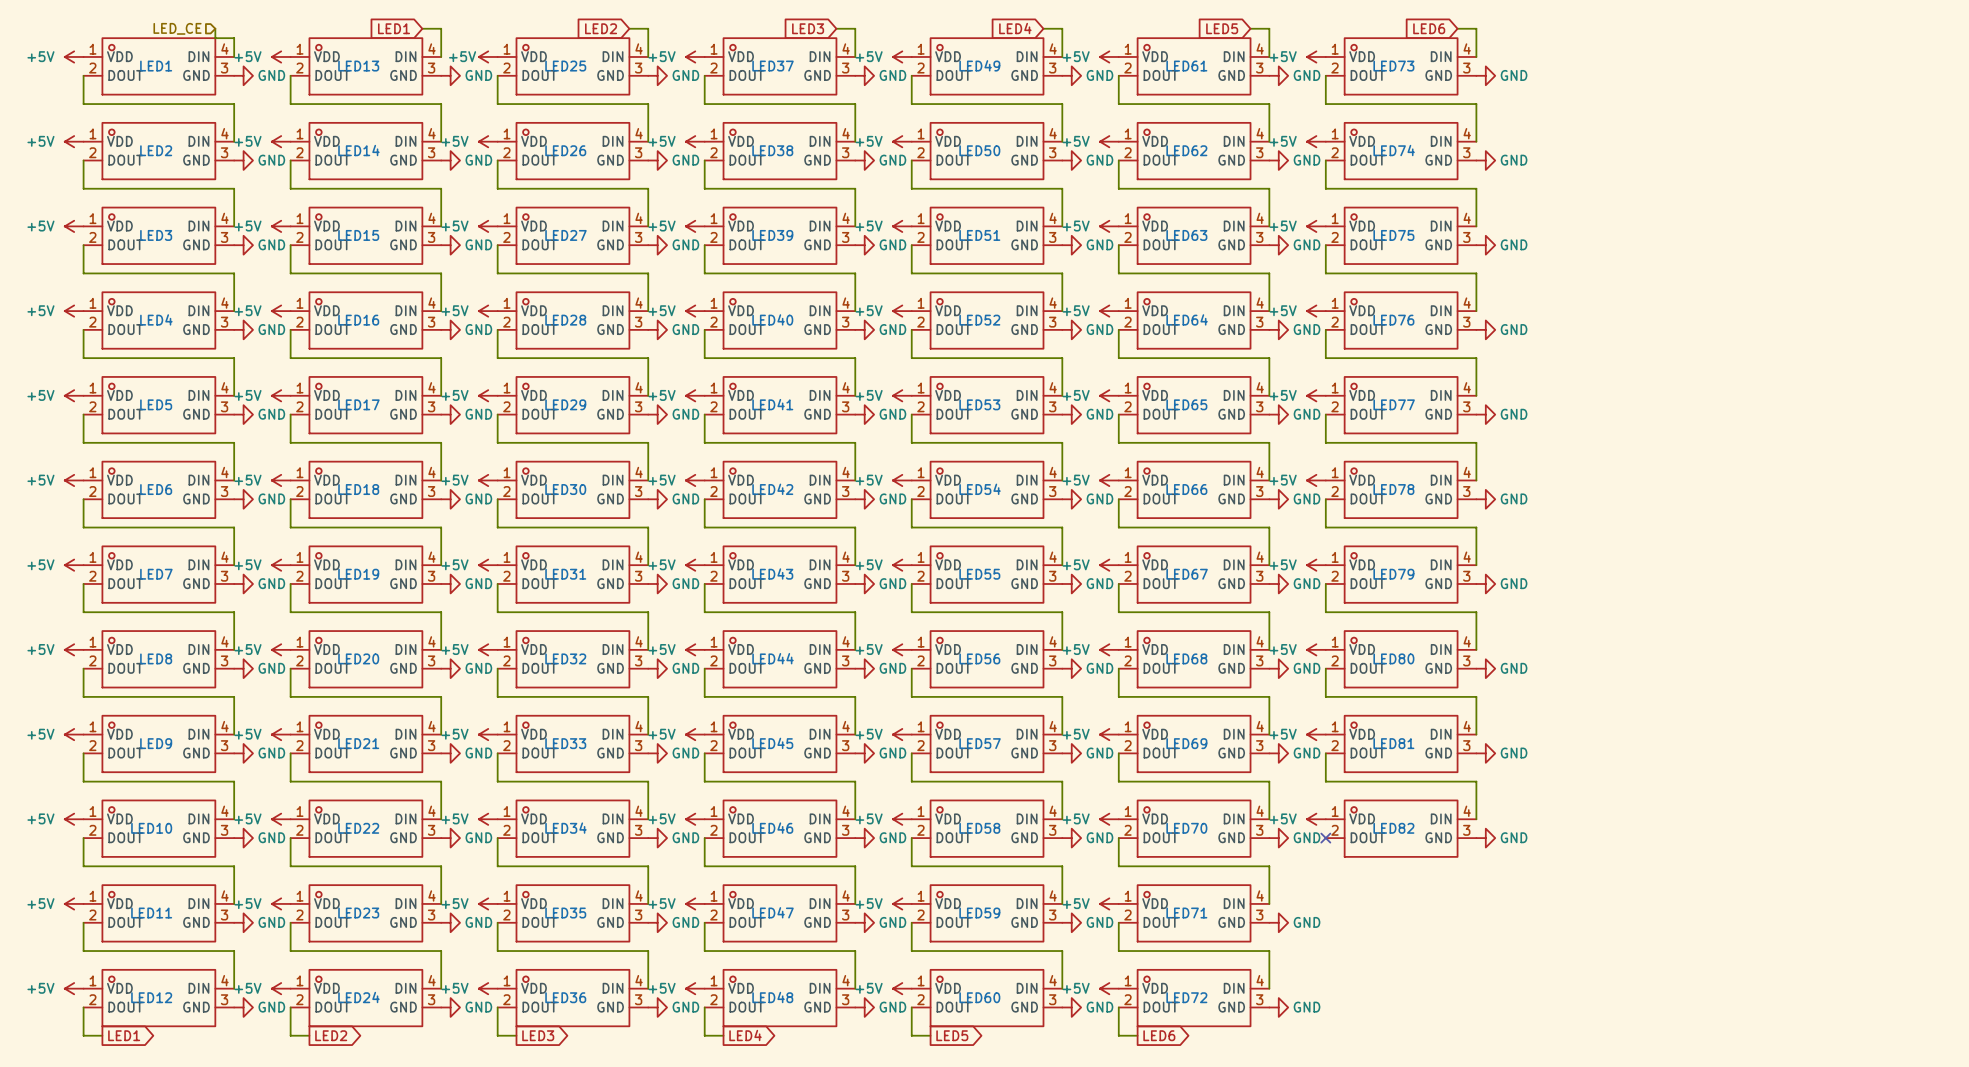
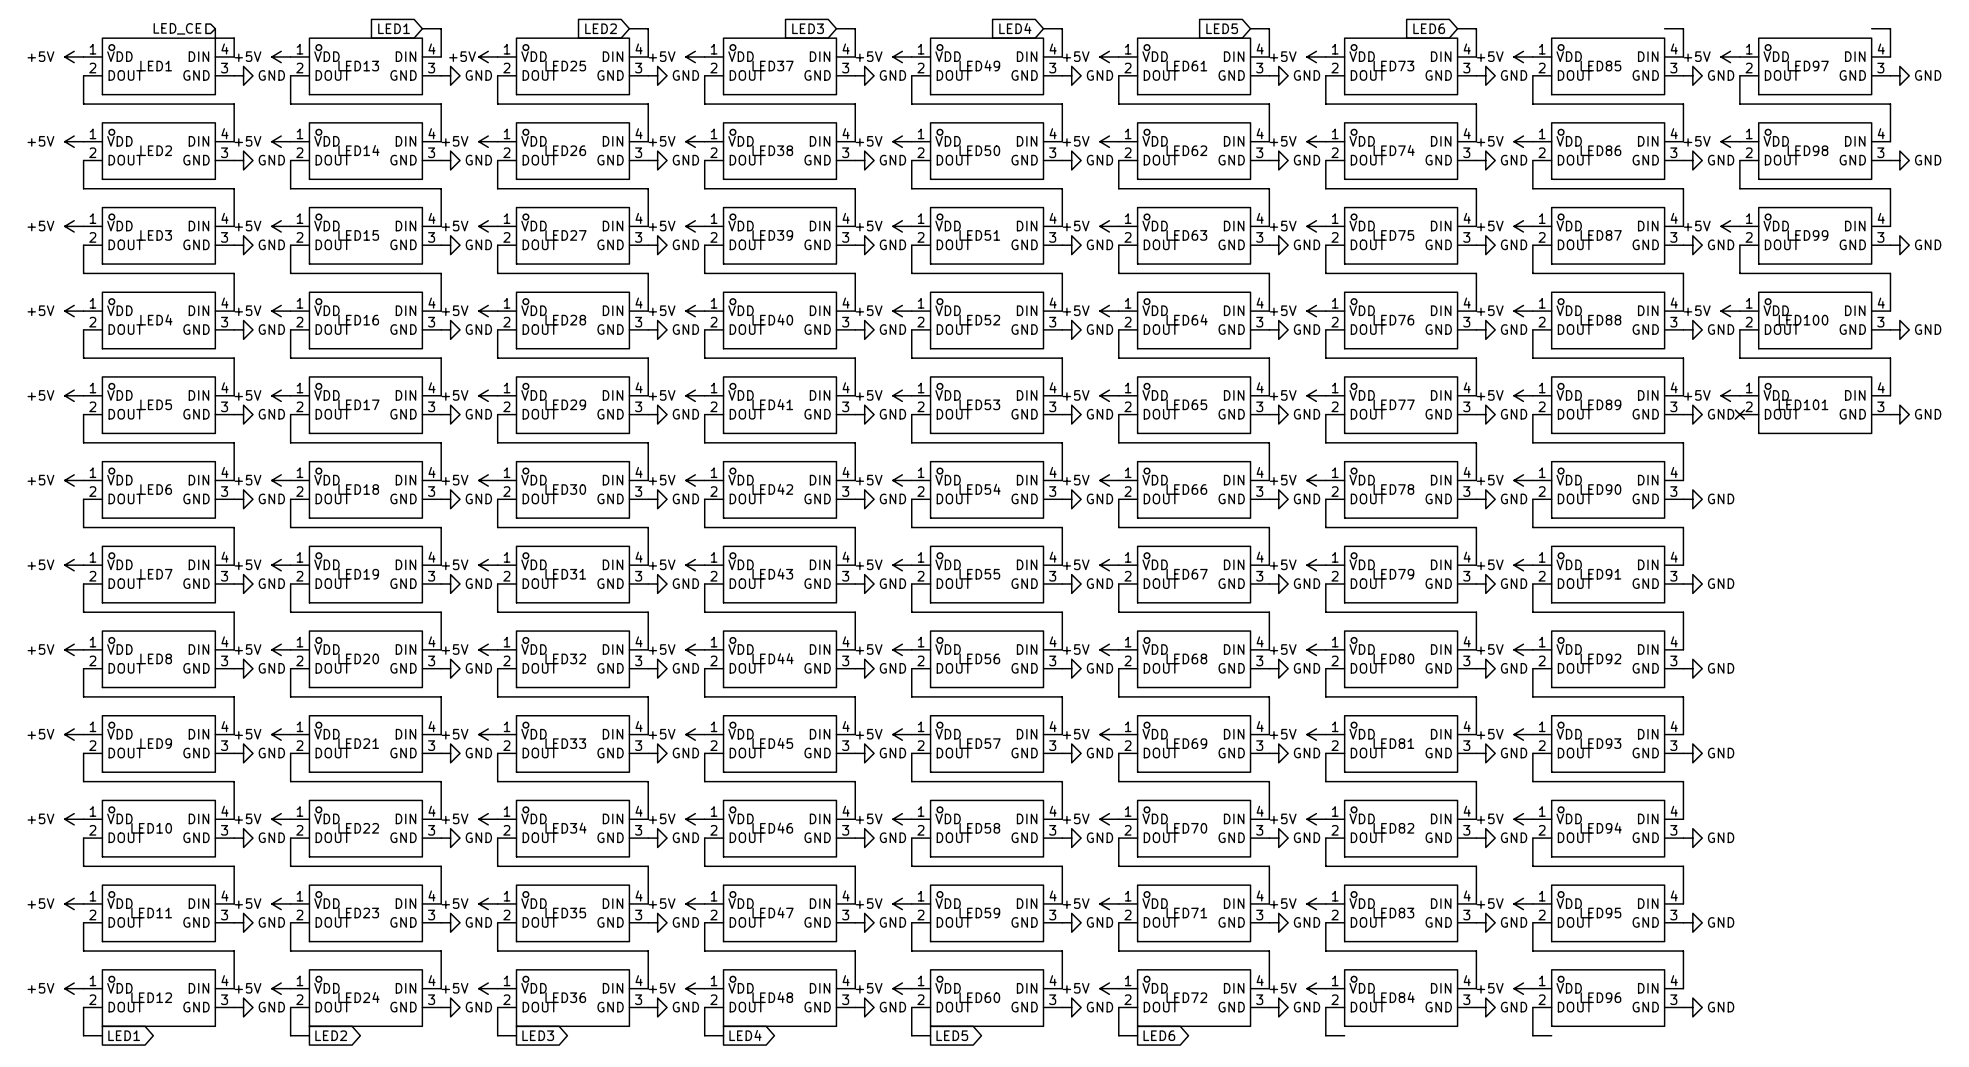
wire: none -> (1664, 28) (1683, 28) (1683, 56)
wire: none -> (1871, 28) (1890, 28) (1890, 56)
power symbol: none -> +5V (1523, 56)
power symbol: none -> +5V (1730, 56)
LED85: none -> (1608, 66)
LED97: none -> (1815, 66)
wire: none -> (1532, 75) (1532, 104) (1683, 104) (1683, 141)
power symbol: none -> GND (1692, 75)
wire: none -> (1739, 75) (1739, 104) (1890, 104) (1890, 141)
power symbol: none -> GND (1899, 75)
power symbol: none -> +5V (1523, 141)
power symbol: none -> +5V (1730, 141)
LED86: none -> (1608, 151)
LED98: none -> (1815, 151)
wire: none -> (1532, 160) (1532, 188) (1683, 188) (1683, 226)
power symbol: none -> GND (1692, 160)
wire: none -> (1739, 160) (1739, 188) (1890, 188) (1890, 226)
power symbol: none -> GND (1899, 160)
power symbol: none -> +5V (1523, 226)
power symbol: none -> +5V (1730, 226)
LED87: none -> (1608, 235)
LED99: none -> (1815, 235)
wire: none -> (1532, 245) (1532, 273) (1683, 273) (1683, 311)
power symbol: none -> GND (1692, 245)
wire: none -> (1739, 245) (1739, 273) (1890, 273) (1890, 311)
power symbol: none -> GND (1899, 245)
power symbol: none -> +5V (1523, 311)
power symbol: none -> +5V (1730, 311)
LED88: none -> (1608, 320)
LED100: none -> (1815, 320)
wire: none -> (1532, 329) (1532, 358) (1683, 358) (1683, 395)
power symbol: none -> GND (1692, 329)
wire: none -> (1739, 329) (1739, 358) (1890, 358) (1890, 395)
power symbol: none -> GND (1899, 329)
power symbol: none -> +5V (1523, 395)
power symbol: none -> +5V (1730, 395)
LED89: none -> (1608, 405)
LED101: none -> (1815, 405)
wire: none -> (1532, 414) (1532, 442) (1683, 442) (1683, 480)
power symbol: none -> GND (1692, 414)
no-connect mark: none -> (1739, 414)
power symbol: none -> GND (1899, 414)
power symbol: none -> +5V (1523, 480)
LED90: none -> (1608, 489)
wire: none -> (1532, 499) (1532, 527) (1683, 527) (1683, 565)
power symbol: none -> GND (1692, 499)
power symbol: none -> +5V (1523, 565)
LED91: none -> (1608, 574)
wire: none -> (1532, 583) (1532, 612) (1683, 612) (1683, 649)
power symbol: none -> GND (1692, 583)
power symbol: none -> +5V (1523, 649)
LED92: none -> (1608, 659)
wire: none -> (1532, 668) (1532, 696) (1683, 696) (1683, 734)
power symbol: none -> GND (1692, 668)
power symbol: none -> +5V (1523, 734)
LED93: none -> (1608, 743)
wire: none -> (1532, 753) (1532, 781) (1683, 781) (1683, 819)
power symbol: none -> GND (1692, 753)
power symbol: none -> +5V (1523, 819)
LED94: none -> (1608, 828)
wire: none -> (1325, 838) (1325, 866) (1476, 866) (1476, 903)
no-connect mark: (1325, 838) -> none
wire: none -> (1532, 838) (1532, 866) (1683, 866) (1683, 903)
power symbol: none -> GND (1692, 838)
power symbol: none -> +5V (1316, 903)
power symbol: none -> +5V (1523, 903)
LED83: none -> (1401, 913)
LED95: none -> (1608, 913)
wire: none -> (1325, 922) (1325, 951) (1476, 951) (1476, 988)
power symbol: none -> GND (1485, 922)
wire: none -> (1532, 922) (1532, 951) (1683, 951) (1683, 988)
power symbol: none -> GND (1692, 922)
power symbol: none -> +5V (1316, 988)
power symbol: none -> +5V (1523, 988)
LED84: none -> (1401, 998)
LED96: none -> (1608, 998)
wire: none -> (1325, 1007) (1325, 1035) (1344, 1035)
power symbol: none -> GND (1485, 1007)
wire: none -> (1532, 1007) (1532, 1035) (1551, 1035)
power symbol: none -> GND (1692, 1007)

